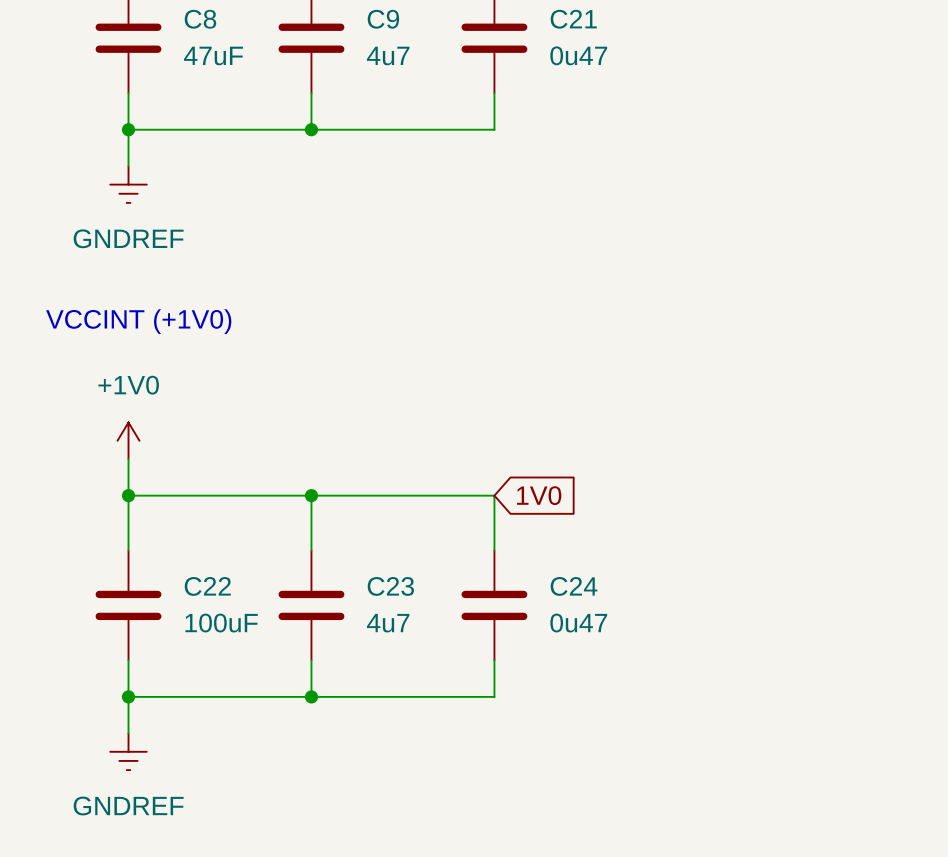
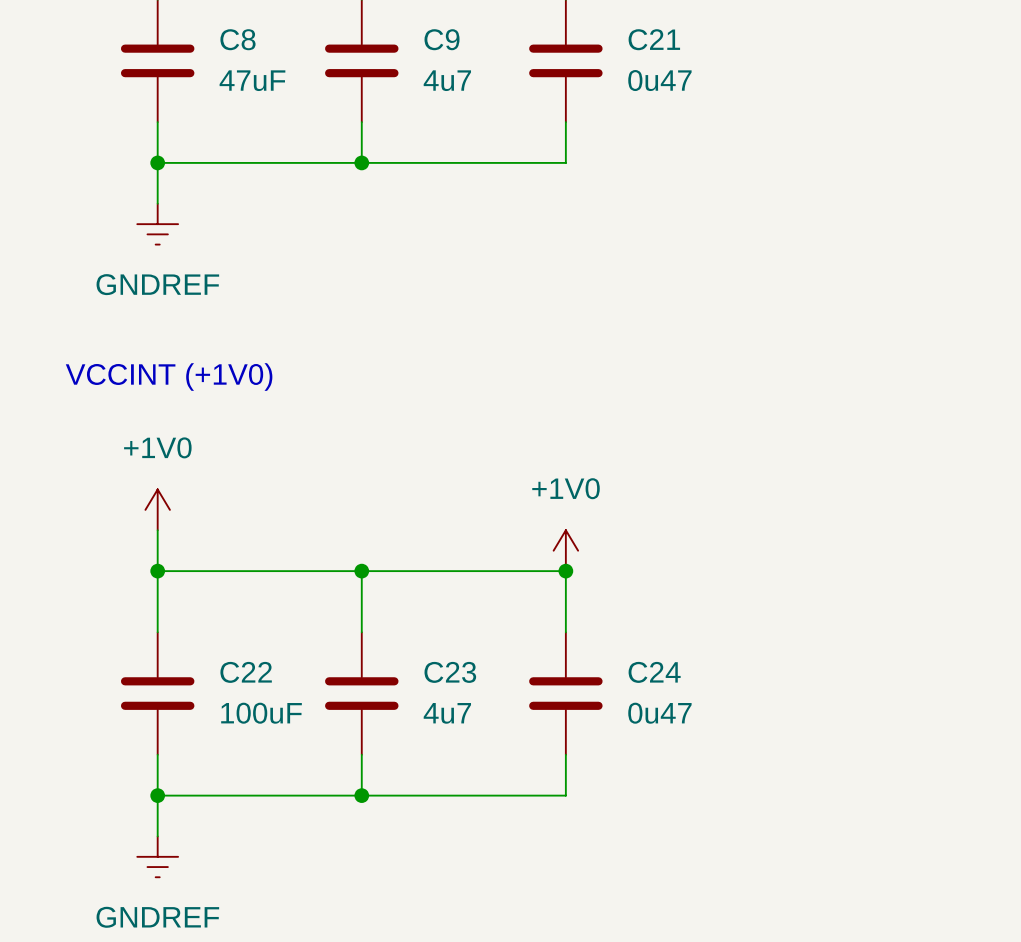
power symbol: none -> +1V0 (565, 550)
junction: none -> (565, 571)
global label: 1V0 (539, 495) -> none

